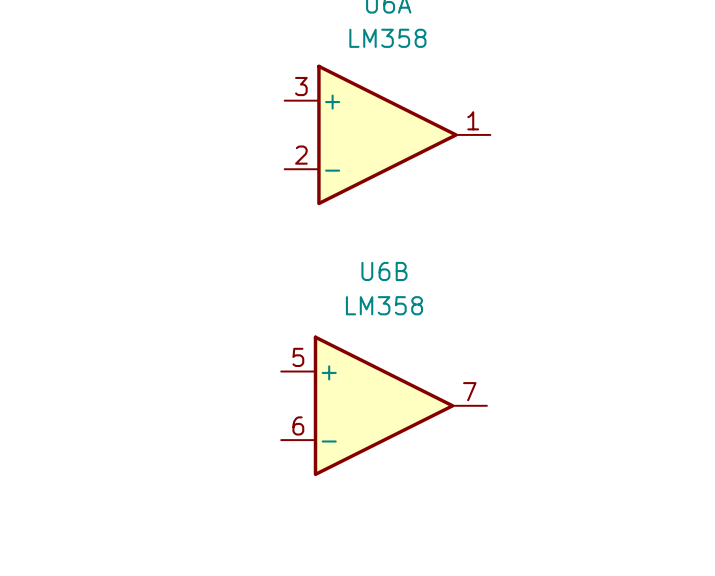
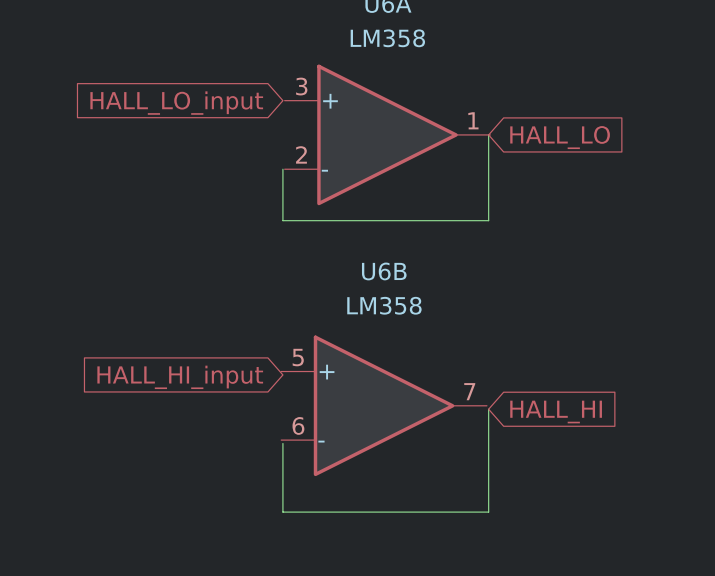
global label: none -> HALL_LO_input (176, 103)
wire: none -> (488, 134) (488, 220) (282, 220) (282, 169)
global label: none -> HALL_LO (560, 137)
global label: none -> HALL_HI_input (180, 377)
wire: none -> (488, 409) (488, 512) (282, 512) (282, 443)
global label: none -> HALL_HI (556, 412)

